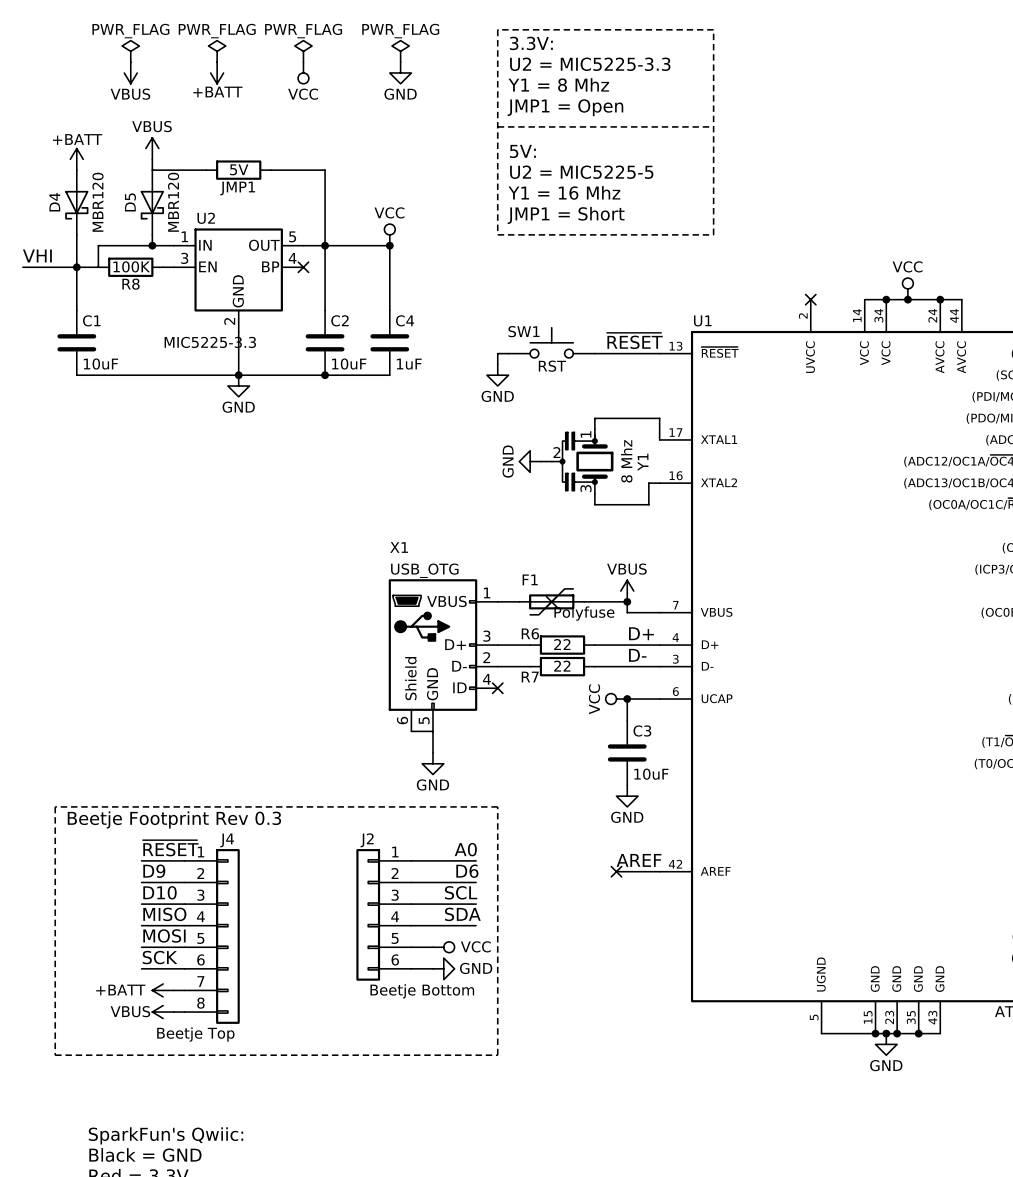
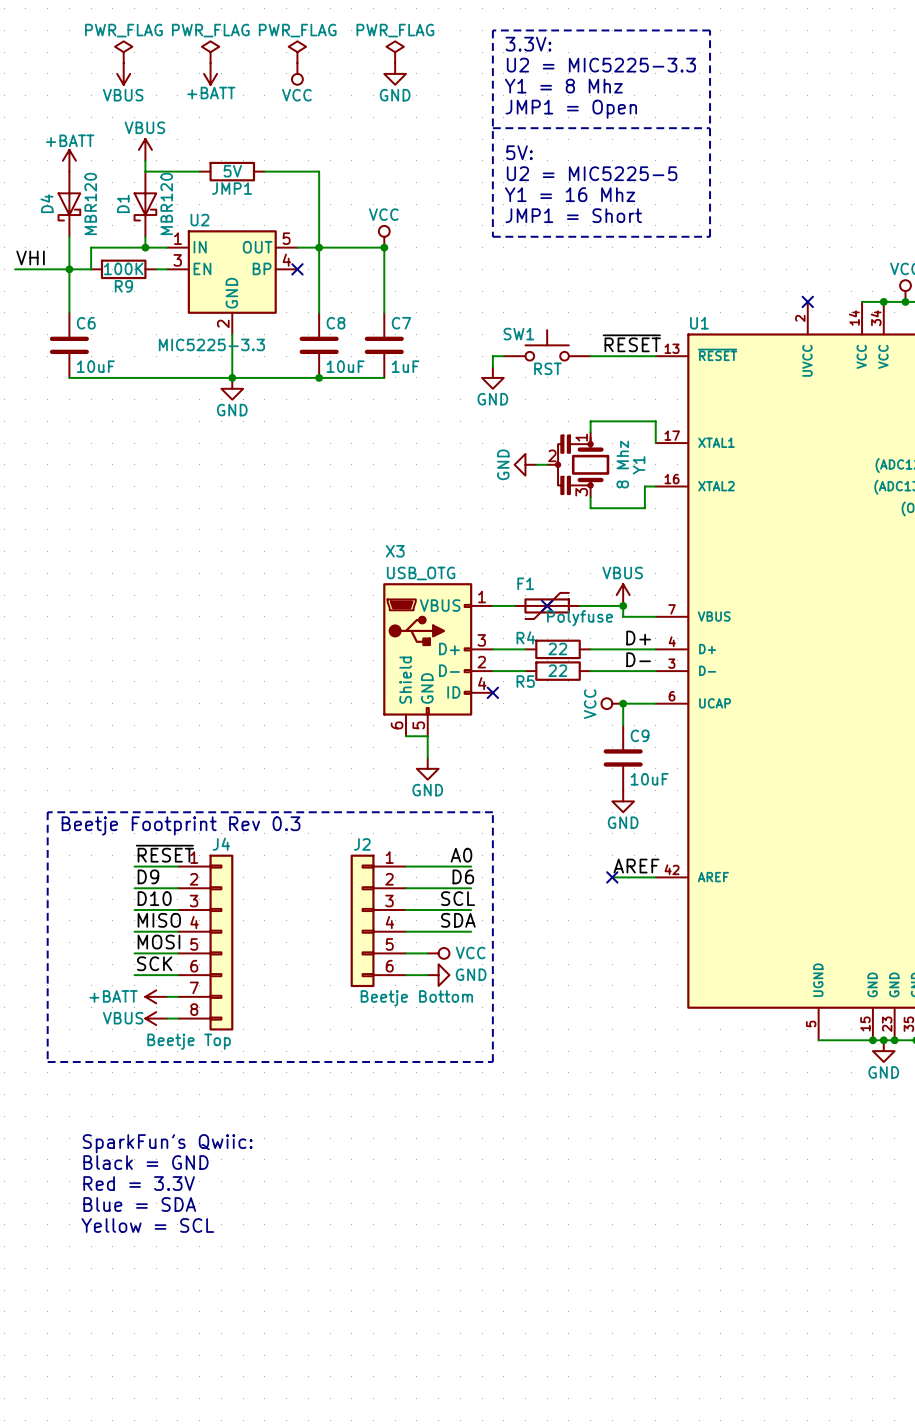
D5 name: D5 (130, 202) -> D1 (123, 203)
R8 name: R8 (130, 284) -> R9 (123, 286)
C1 name: C1 (91, 320) -> C6 (86, 323)
C2 name: C2 (340, 320) -> C8 (336, 323)
C4 name: C4 (405, 320) -> C7 (401, 323)
X1 name: X1 (399, 547) -> X3 (395, 551)
R6 name: R6 (530, 633) -> R4 (525, 637)
R7 name: R7 (530, 677) -> R5 (525, 681)
C3 name: C3 (642, 731) -> C9 (640, 735)

